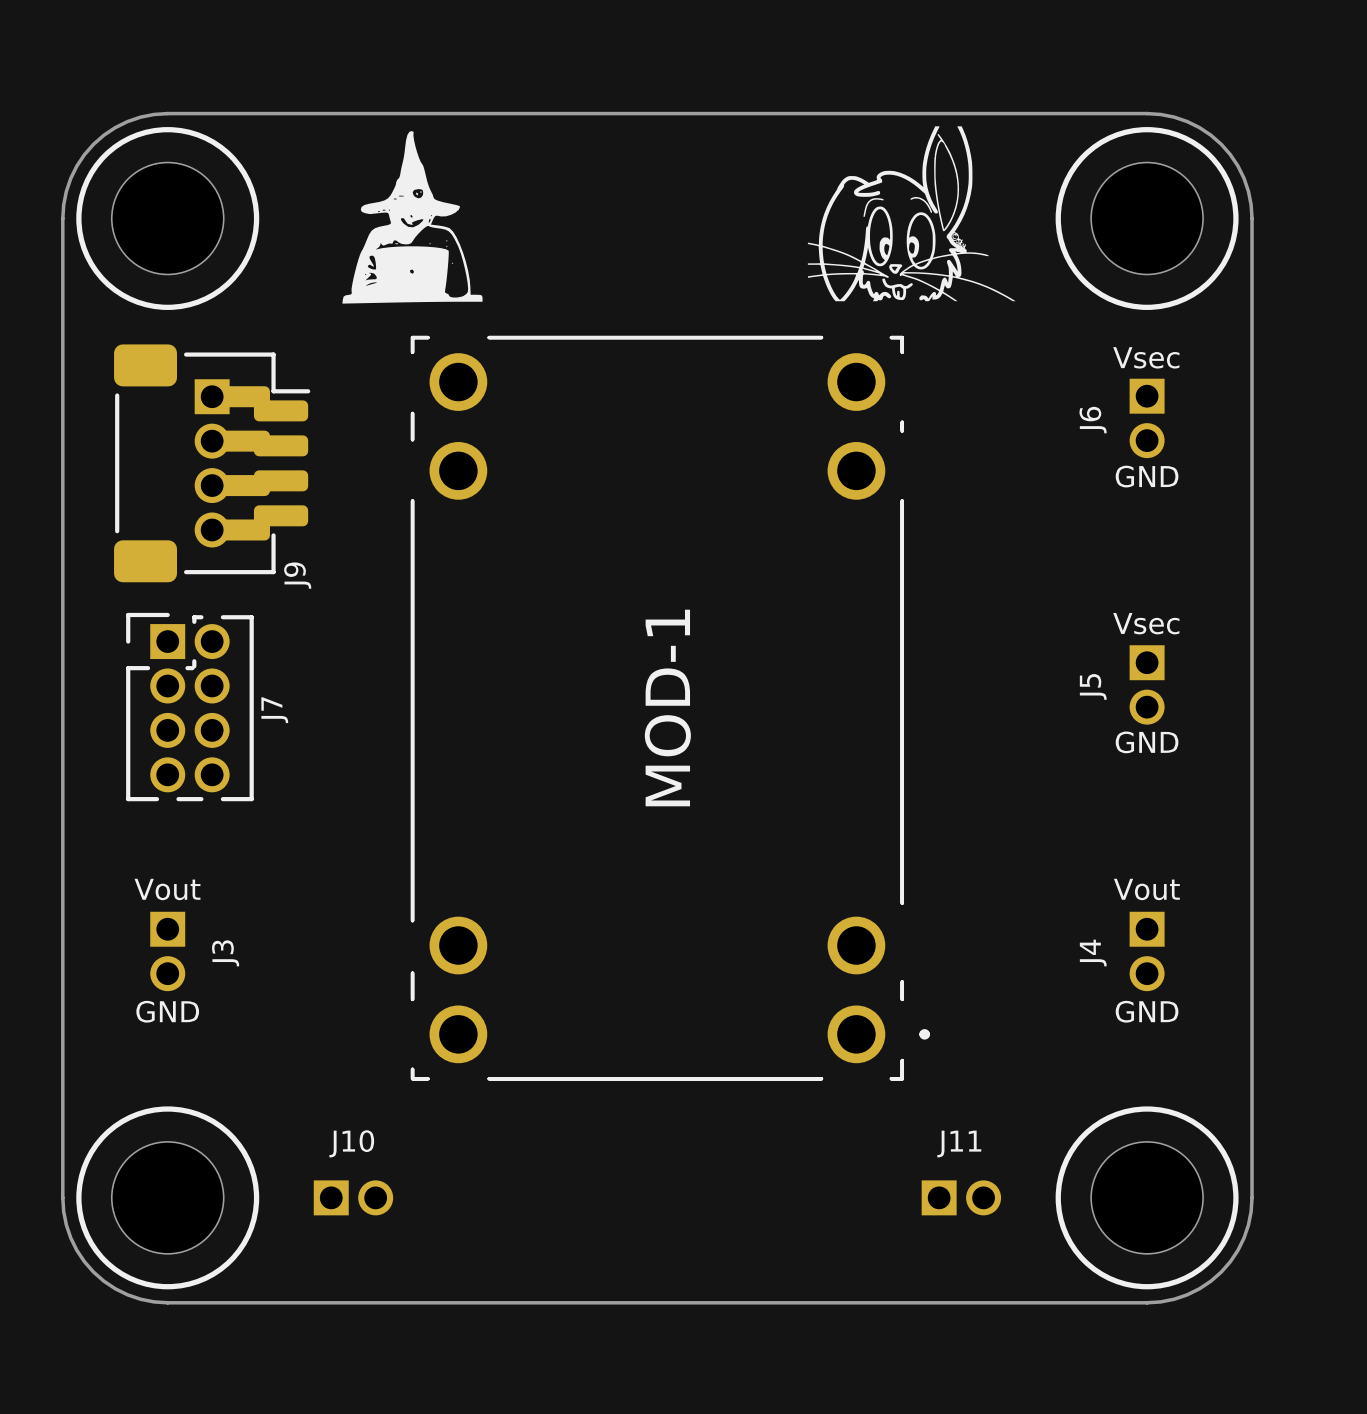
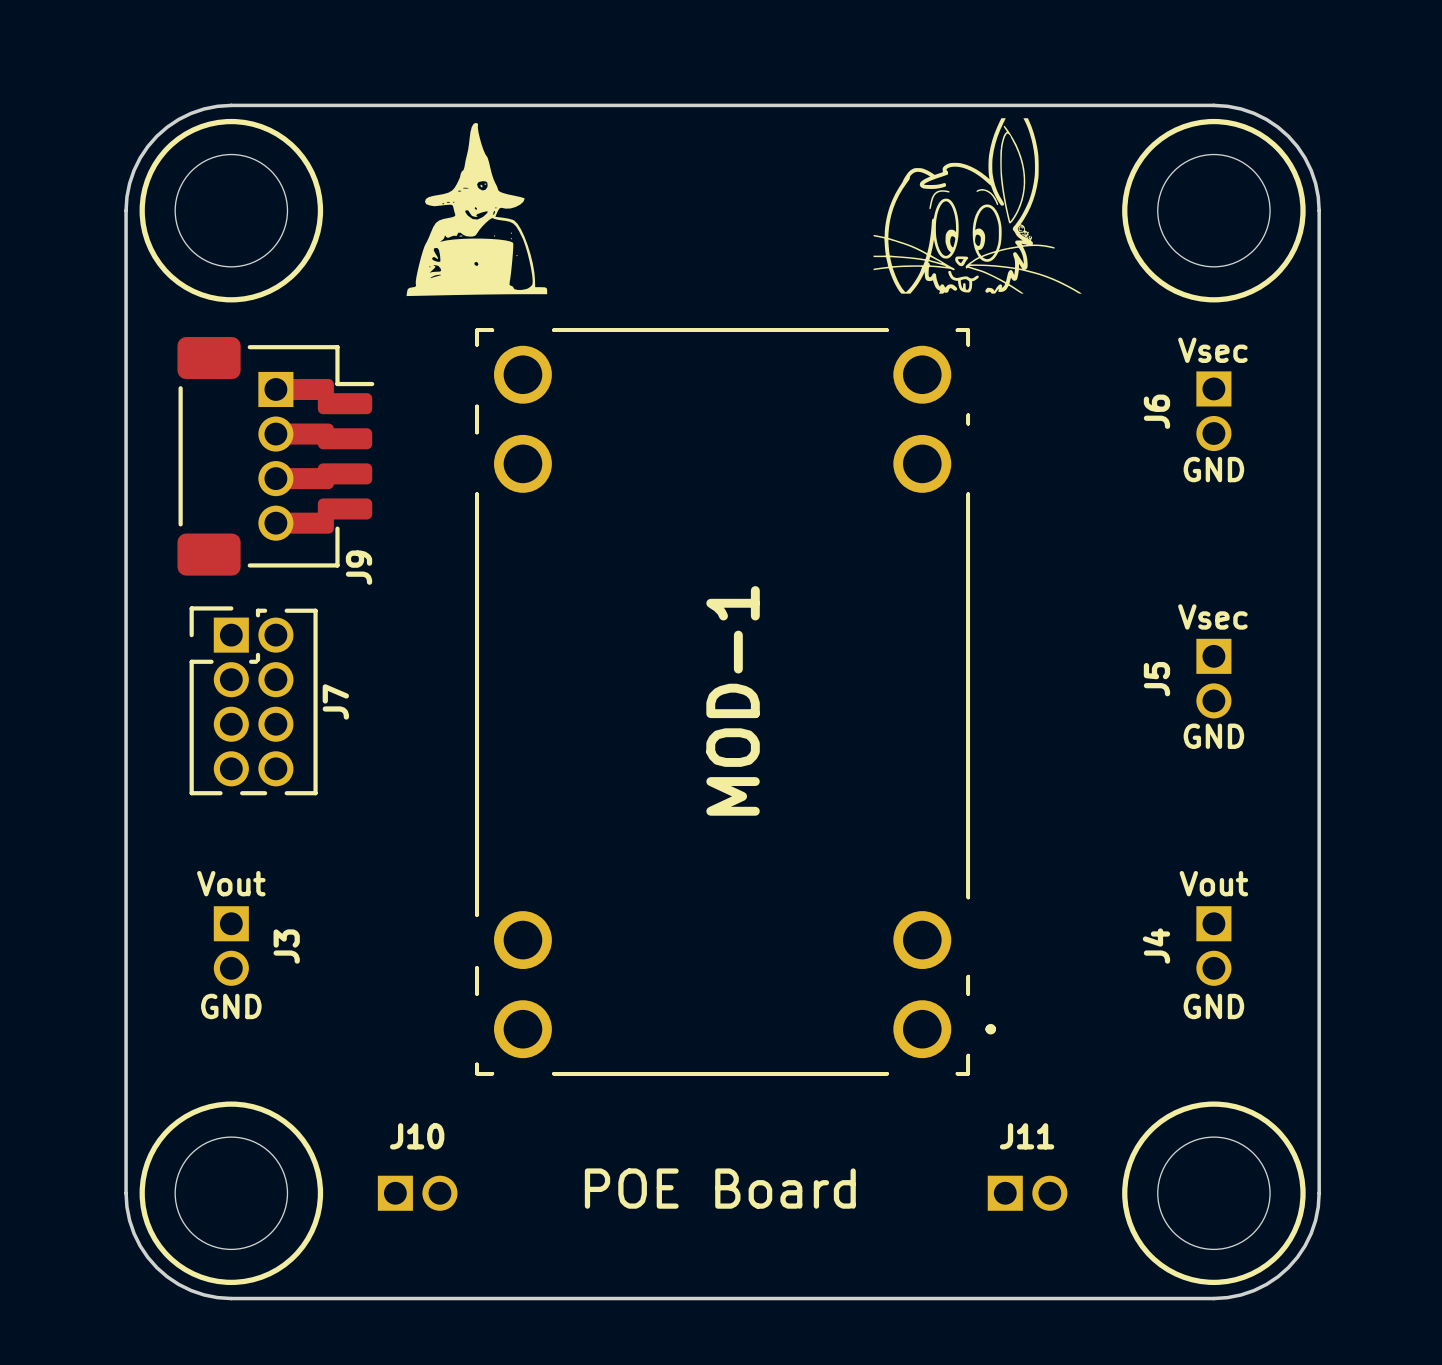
text: none -> POE Board (720, 1188)

